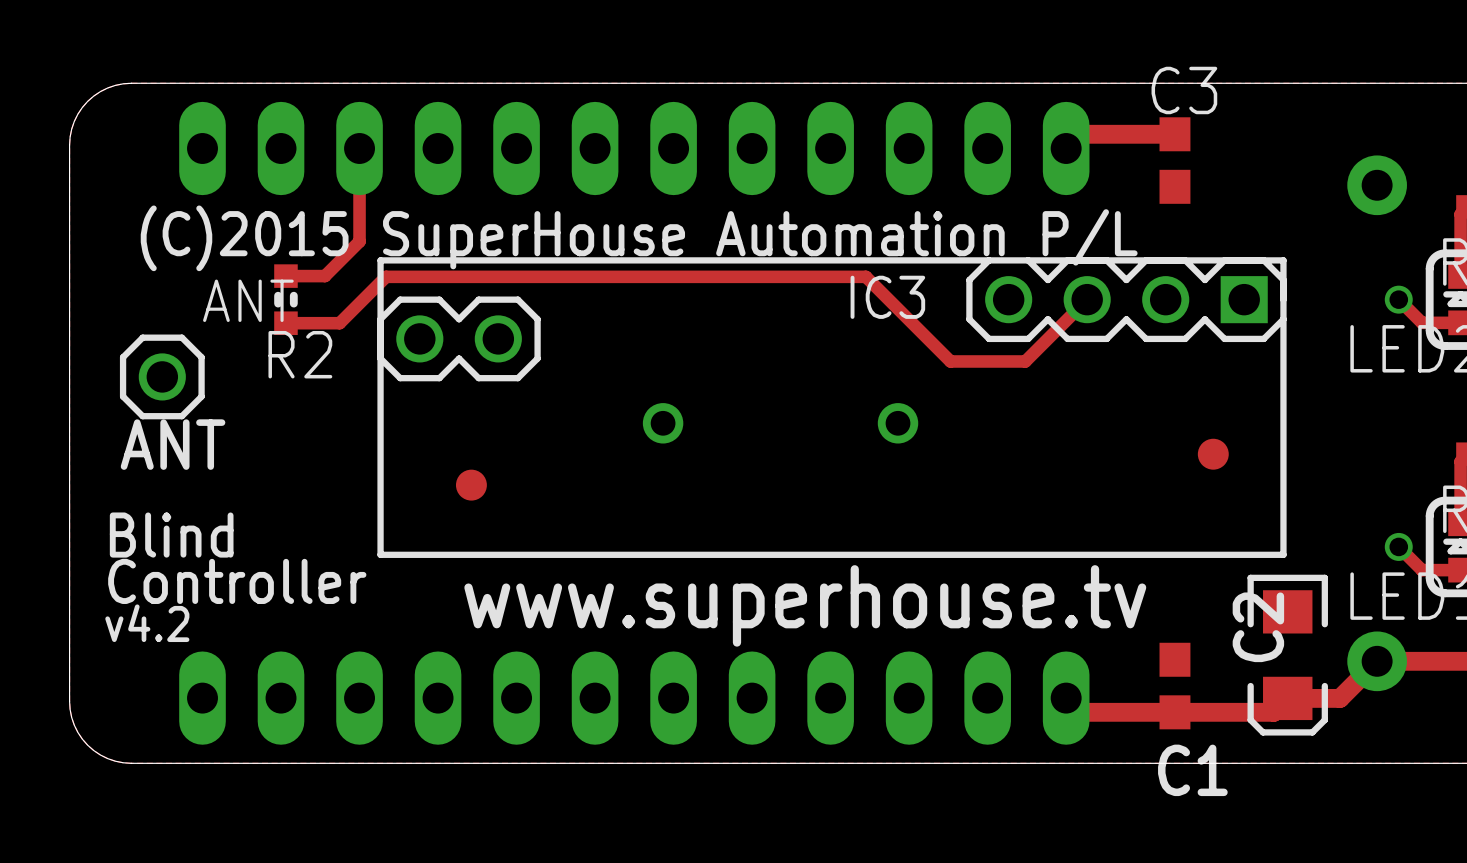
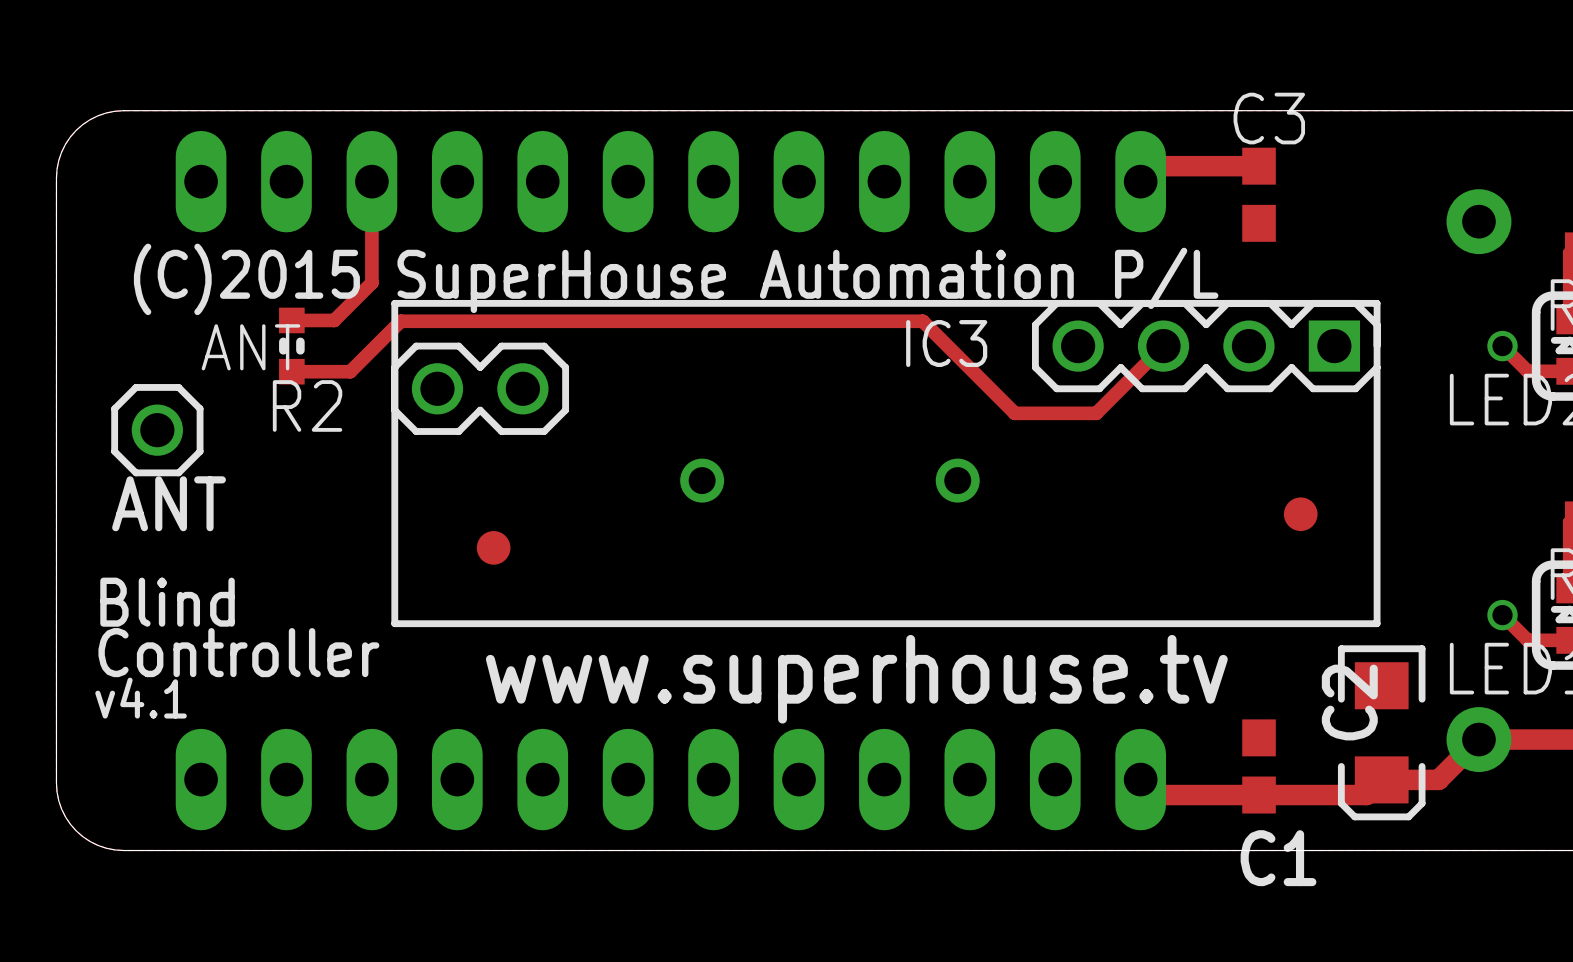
text: v4.2 (147, 623) -> v4.1 (141, 698)

